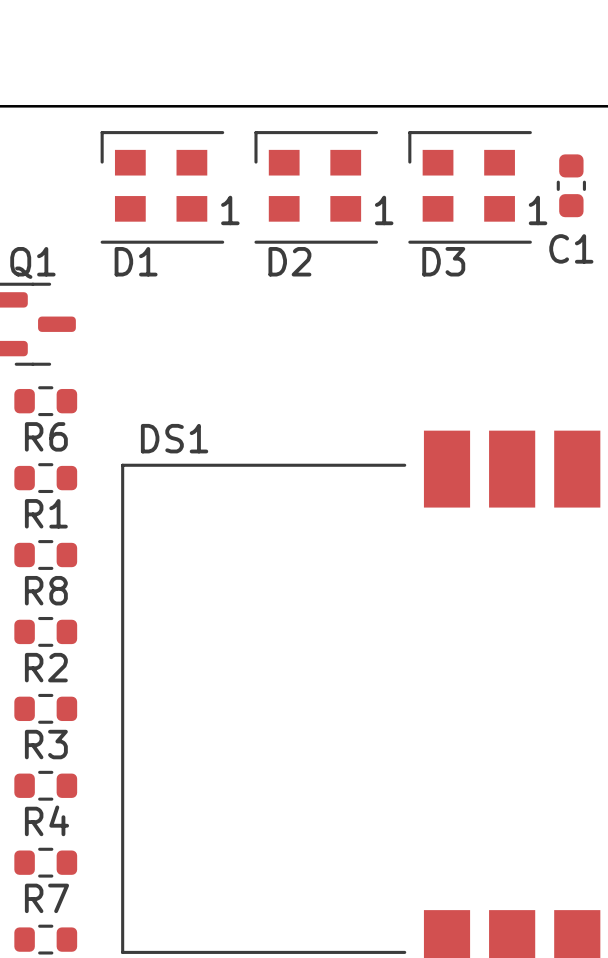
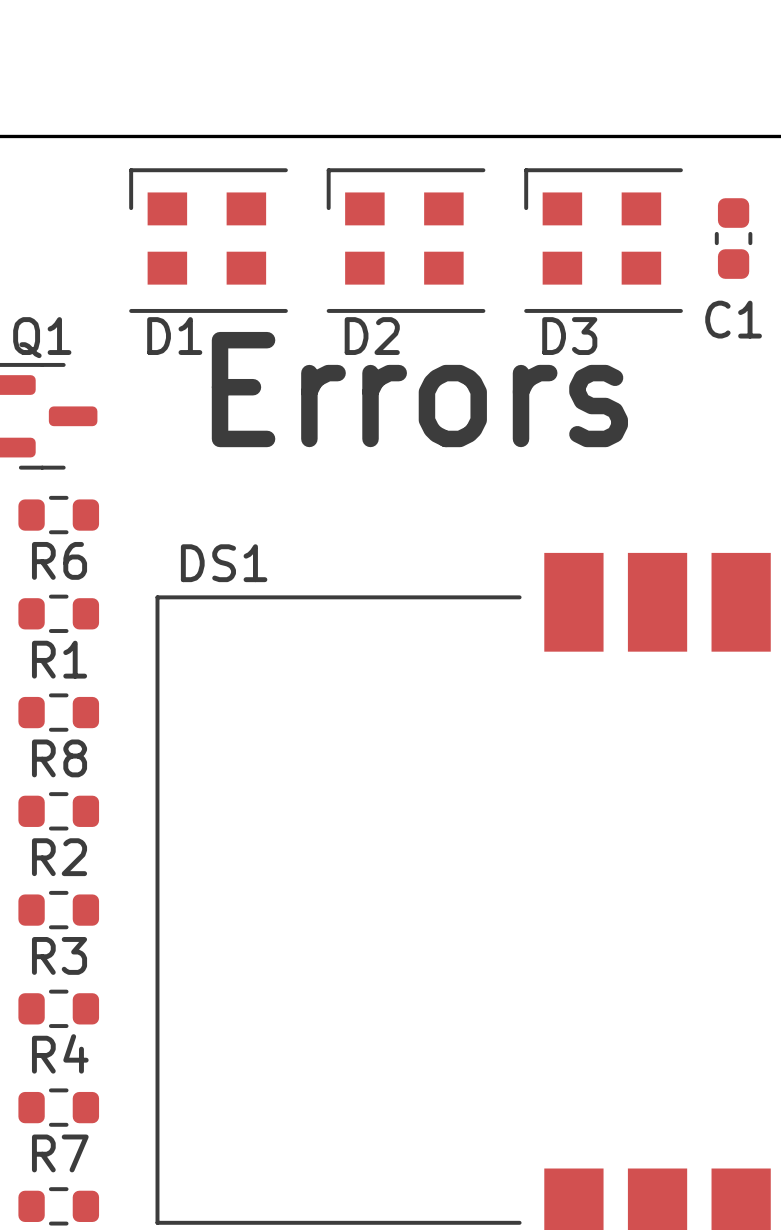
D1 text: 1 (230, 210) -> none
D2 text: 1 (384, 210) -> none
D3 text: 1 (538, 210) -> none
text: none -> Errors (419, 389)

